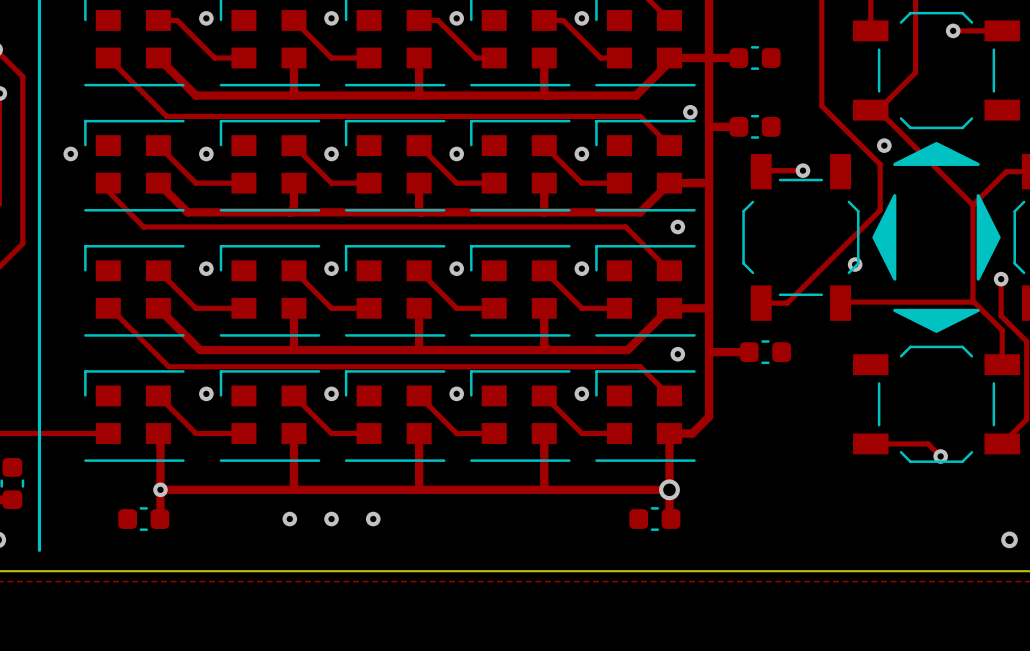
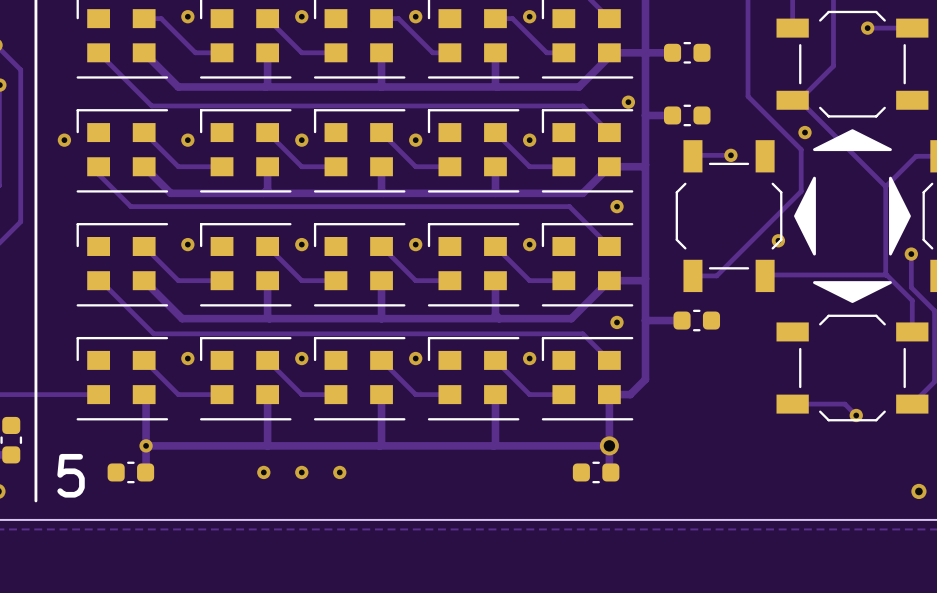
text: none -> 5 (71, 475)

